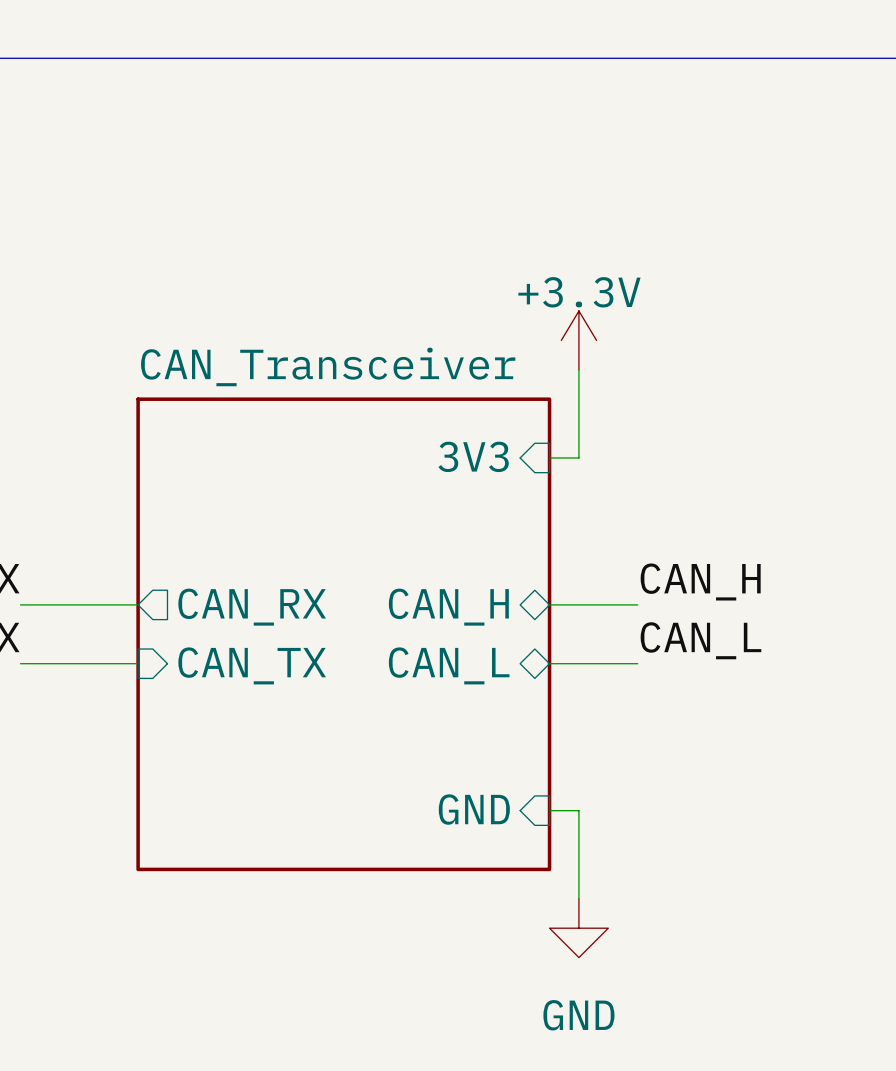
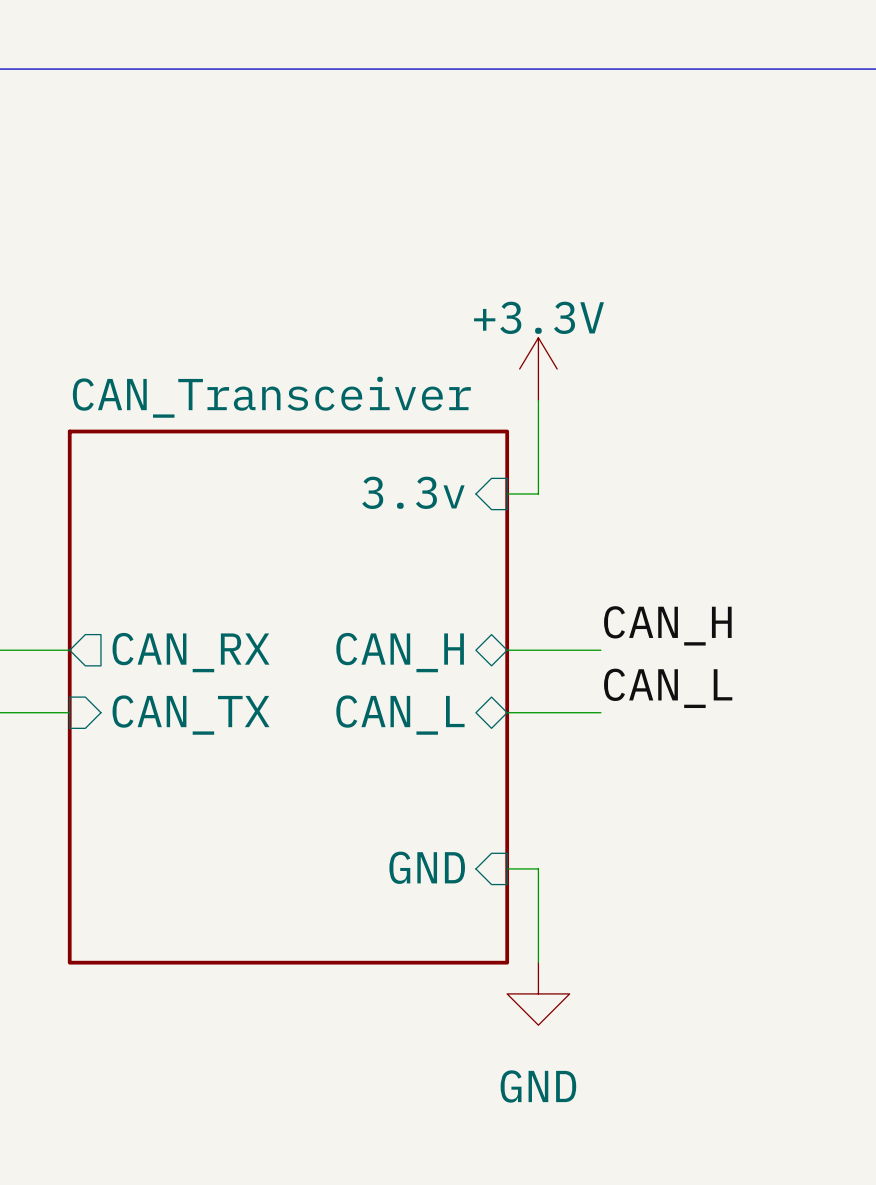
sheet CAN_Transceiver shape: [136, 397, 552, 872] -> [67, 429, 510, 965]
sheet pin: 3V3 (473, 456) -> 3.3v (413, 492)

